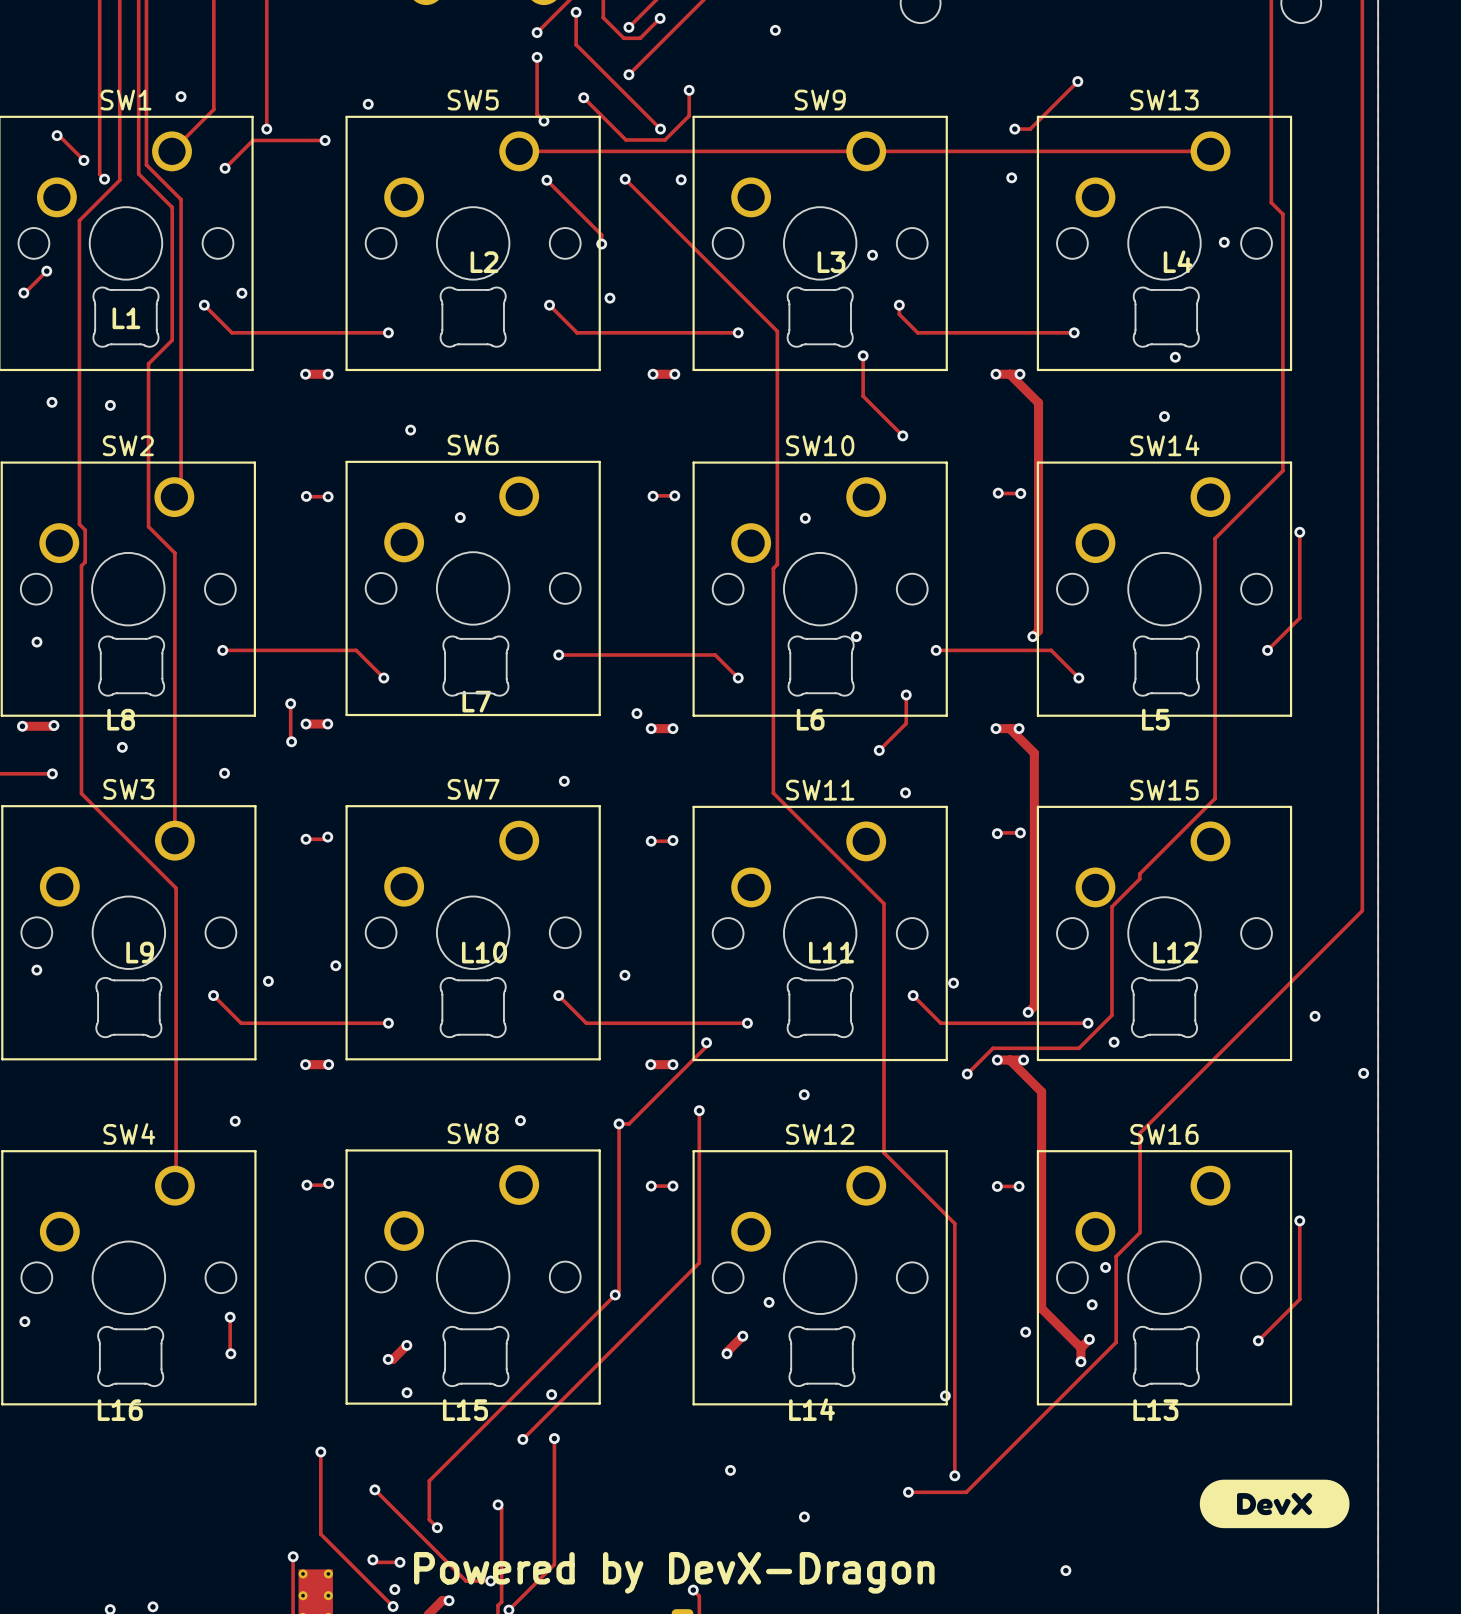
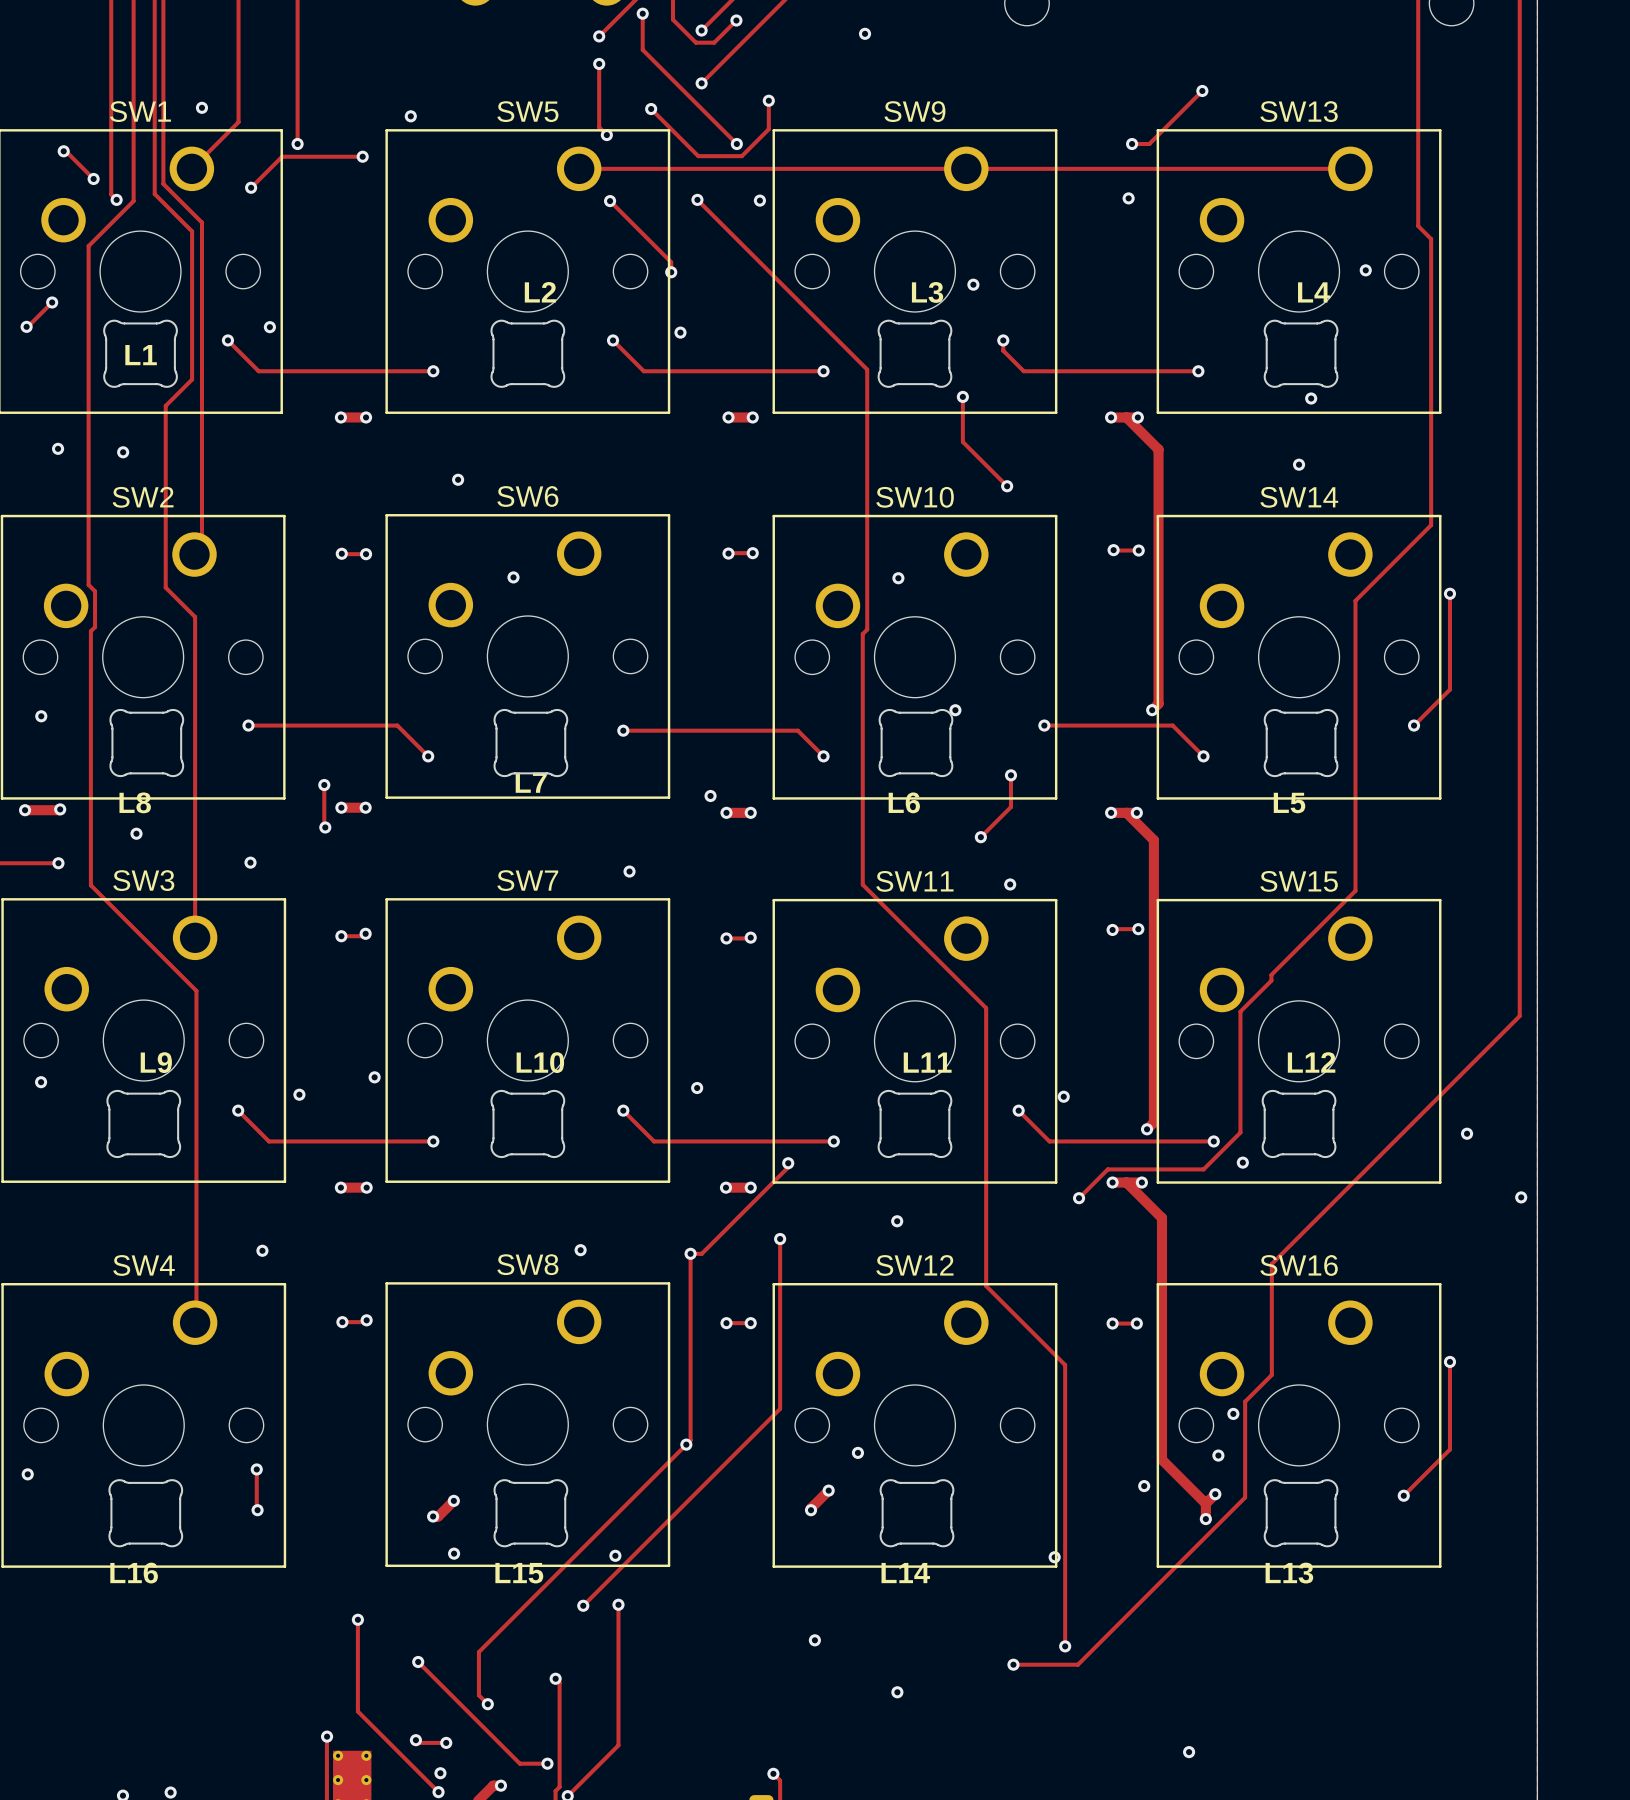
drawing: [1199, 1479, 1350, 1529] -> none
text: Powered by DevX-Dragon (674, 1572) -> none

